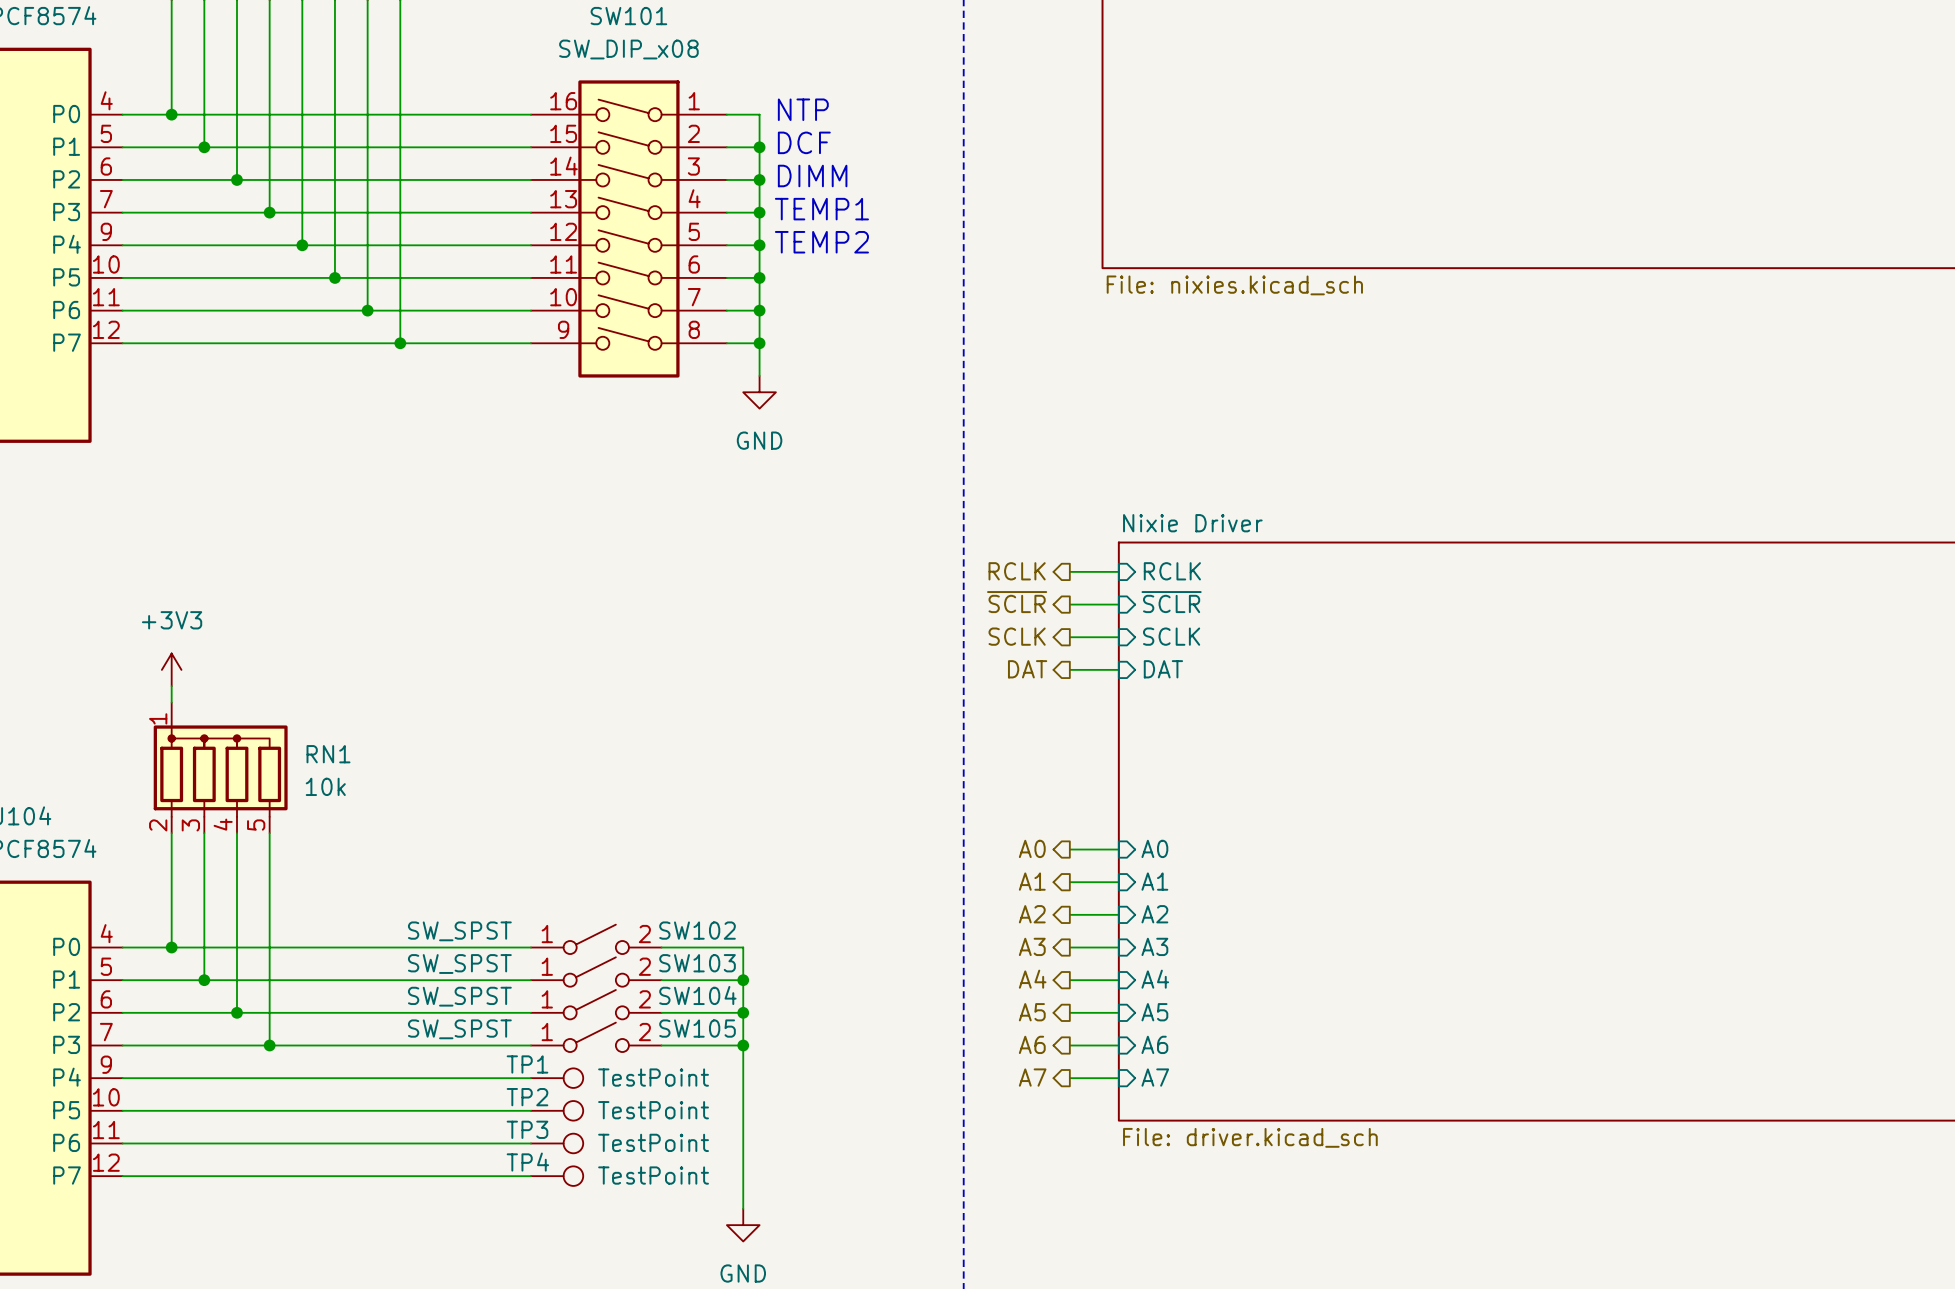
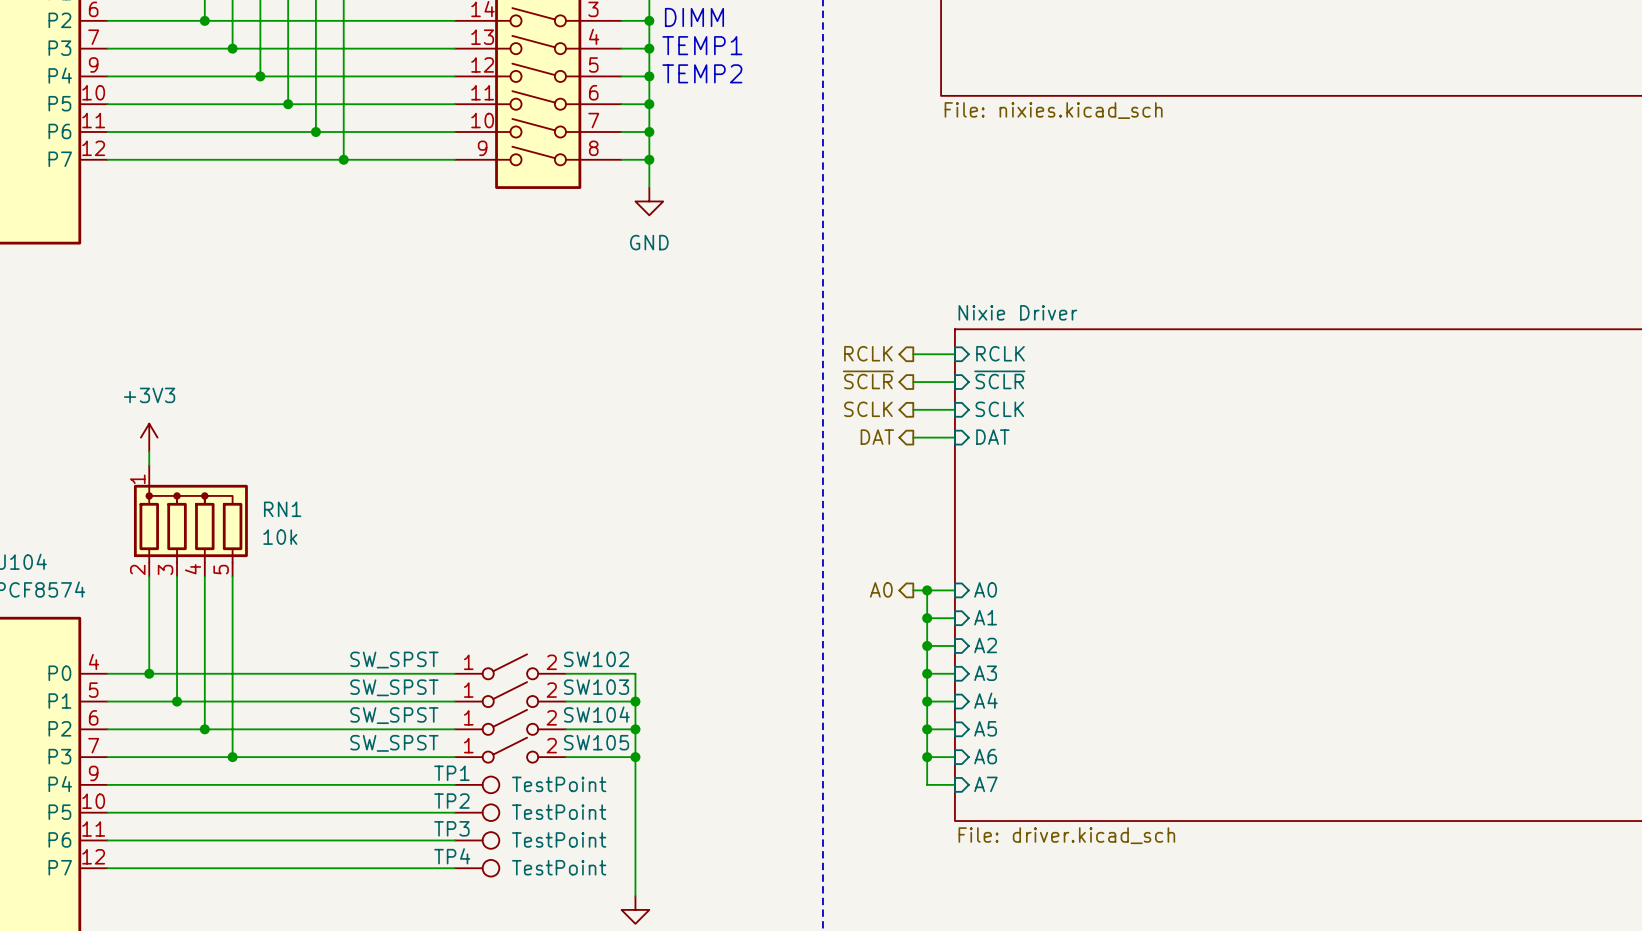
junction: none -> (927, 590)
hierarchical label: A1 (1032, 881) -> none
wire: (1069, 882) (1086, 882) -> none
junction: none -> (927, 618)
hierarchical label: A2 (1032, 914) -> none
wire: (1069, 914) (1086, 914) -> none
junction: none -> (927, 645)
hierarchical label: A3 (1032, 946) -> none
wire: (1069, 947) (1086, 947) -> none
junction: none -> (927, 673)
hierarchical label: A4 (1032, 979) -> none
wire: (1069, 980) (1086, 980) -> none
junction: none -> (927, 701)
hierarchical label: A5 (1032, 1012) -> none
wire: (1069, 1012) (1086, 1012) -> none
junction: none -> (927, 729)
hierarchical label: A6 (1032, 1044) -> none
wire: (1069, 1045) (1086, 1045) -> none
junction: none -> (927, 757)
hierarchical label: A7 (1032, 1077) -> none
wire: (1069, 1078) (1086, 1078) -> (927, 590) (927, 784)

